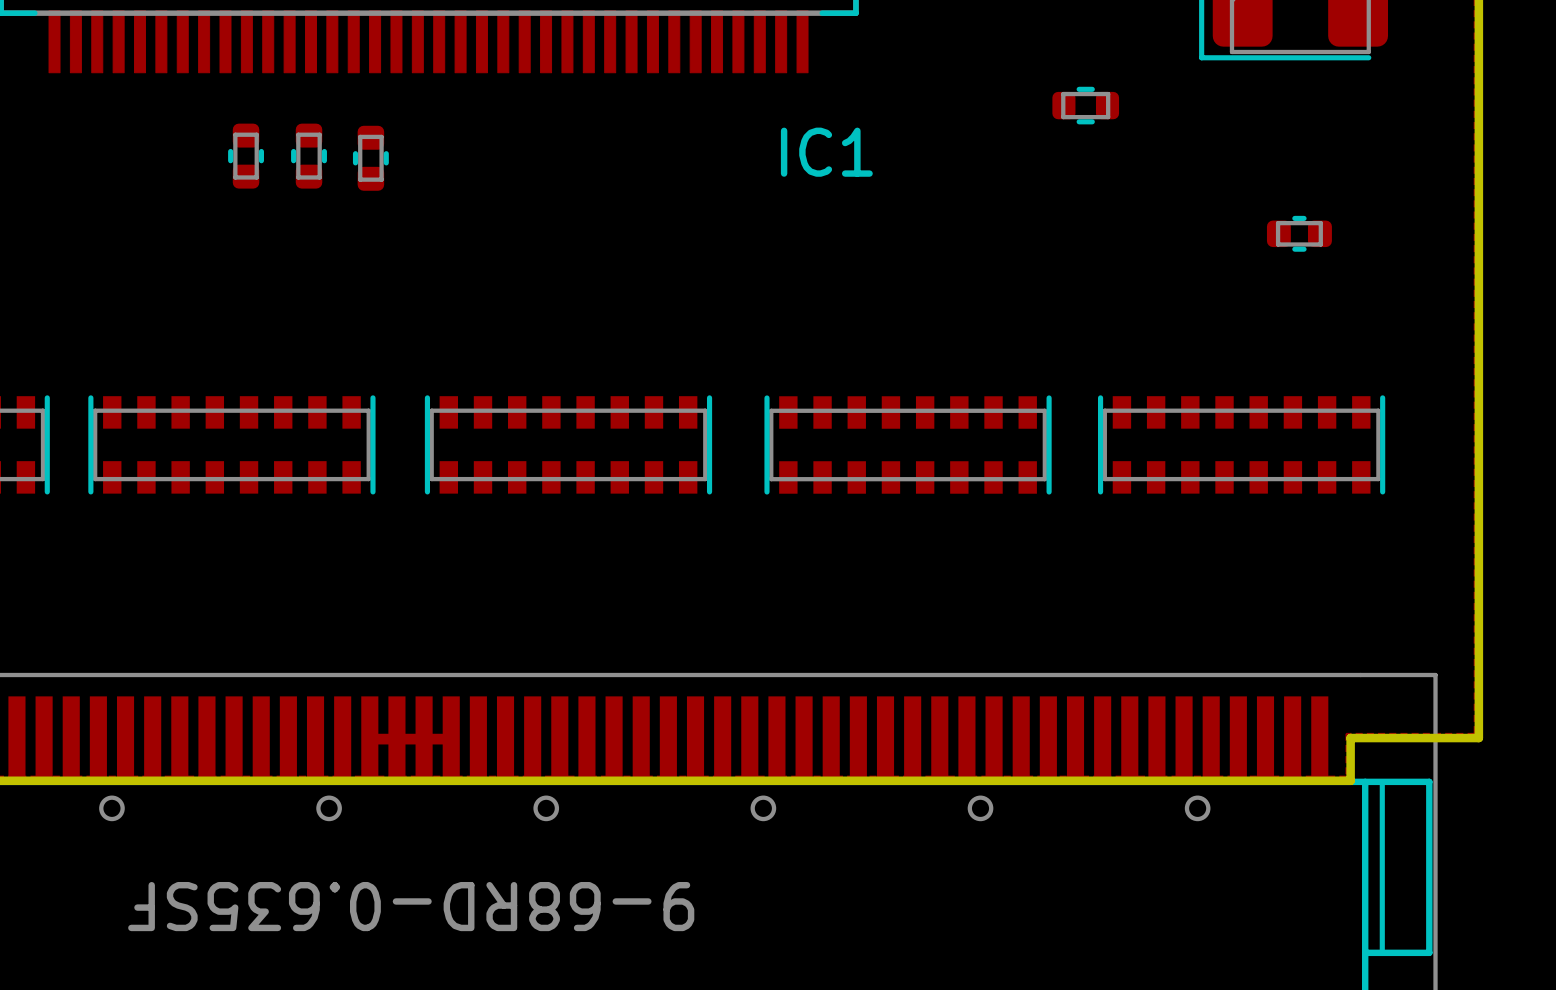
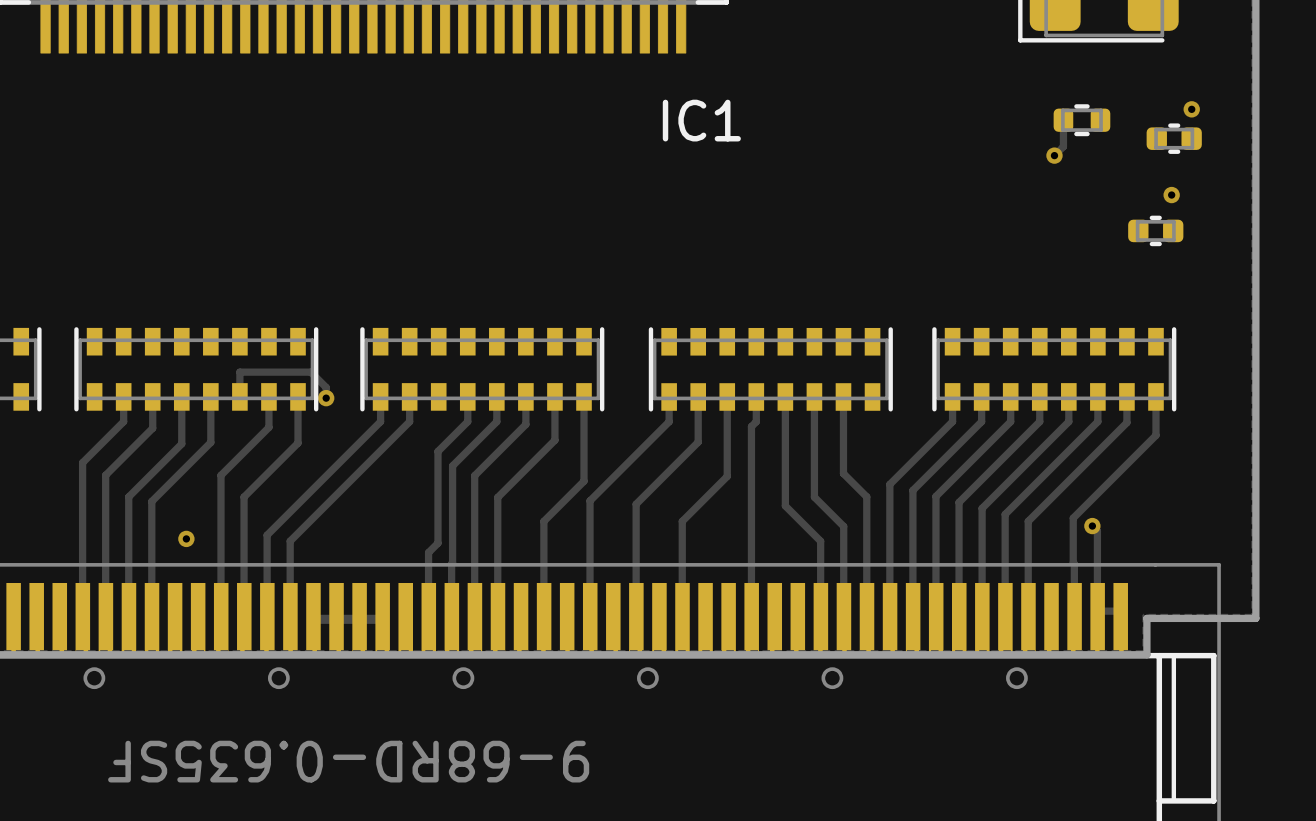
part: (1085, 105) -> none
via: none -> (1191, 109)
track: none -> (1063, 120) (1063, 146) (1054, 155)
part: none -> (1081, 120)
part: (246, 156) -> none
part: (309, 156) -> none
part: (370, 158) -> none
part: none -> (1174, 138)
via: none -> (1054, 155)
part: (1299, 233) -> none
via: none -> (1171, 195)
part: none -> (1155, 230)
track: none -> (123, 396) (123, 421) (82, 462) (82, 611)
track: none -> (152, 396) (152, 428) (105, 475) (105, 611)
track: none -> (181, 396) (181, 443) (128, 496) (128, 611)
track: none -> (210, 396) (210, 442) (151, 501) (151, 611)
track: none -> (239, 396) (239, 372) (310, 372) (326, 387) (326, 398)
track: none -> (268, 396) (268, 427) (220, 475) (220, 611)
track: none -> (298, 396) (298, 443) (244, 497) (244, 611)
track: none -> (380, 396) (380, 421) (267, 535) (267, 611)
track: none -> (409, 396) (409, 421) (290, 541) (290, 611)
track: none -> (467, 396) (467, 421) (437, 451) (437, 543) (428, 552) (428, 611)
track: none -> (496, 396) (496, 421) (452, 465) (451, 611)
track: none -> (525, 396) (525, 424) (474, 475) (474, 611)
track: none -> (554, 396) (554, 440) (497, 497) (497, 611)
track: none -> (584, 396) (584, 481) (543, 521) (543, 611)
track: none -> (669, 396) (669, 421) (590, 500) (590, 611)
track: none -> (698, 396) (698, 442) (636, 504) (636, 611)
track: none -> (727, 396) (727, 476) (682, 521) (682, 611)
track: none -> (756, 396) (756, 421) (751, 426) (751, 611)
track: none -> (785, 396) (785, 505) (820, 541) (820, 611)
track: none -> (814, 396) (814, 497) (843, 526) (843, 611)
track: none -> (843, 396) (843, 473) (866, 496) (866, 611)
track: none -> (952, 396) (952, 421) (889, 484) (889, 611)
track: none -> (981, 396) (981, 421) (912, 490) (912, 611)
track: none -> (1010, 396) (1010, 421) (935, 496) (935, 611)
track: none -> (1039, 396) (1039, 421) (959, 502) (959, 611)
track: none -> (1068, 396) (1068, 421) (982, 508) (982, 611)
track: none -> (1097, 396) (1097, 421) (1005, 514) (1005, 611)
track: none -> (1126, 396) (1126, 422) (1028, 521) (1028, 611)
track: none -> (1155, 396) (1155, 435) (1073, 518) (1074, 611)
via: none -> (326, 398)
track: none -> (1092, 526) (1097, 531) (1097, 611) (1120, 611)
via: none -> (1092, 526)
via: none -> (186, 538)

